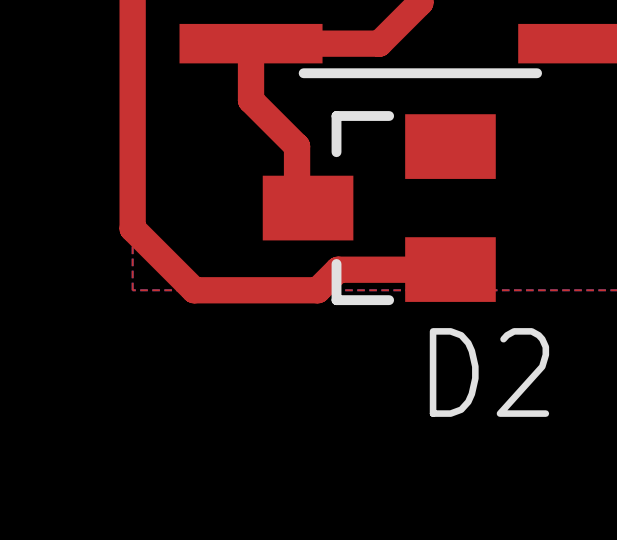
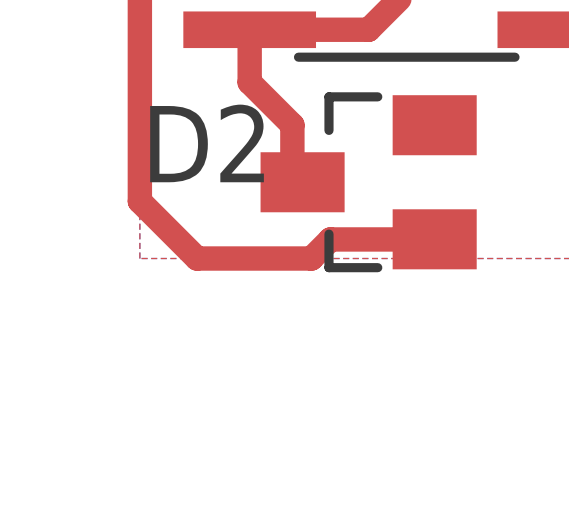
D2 name position: D2 (489, 372) -> D2 (207, 143)

